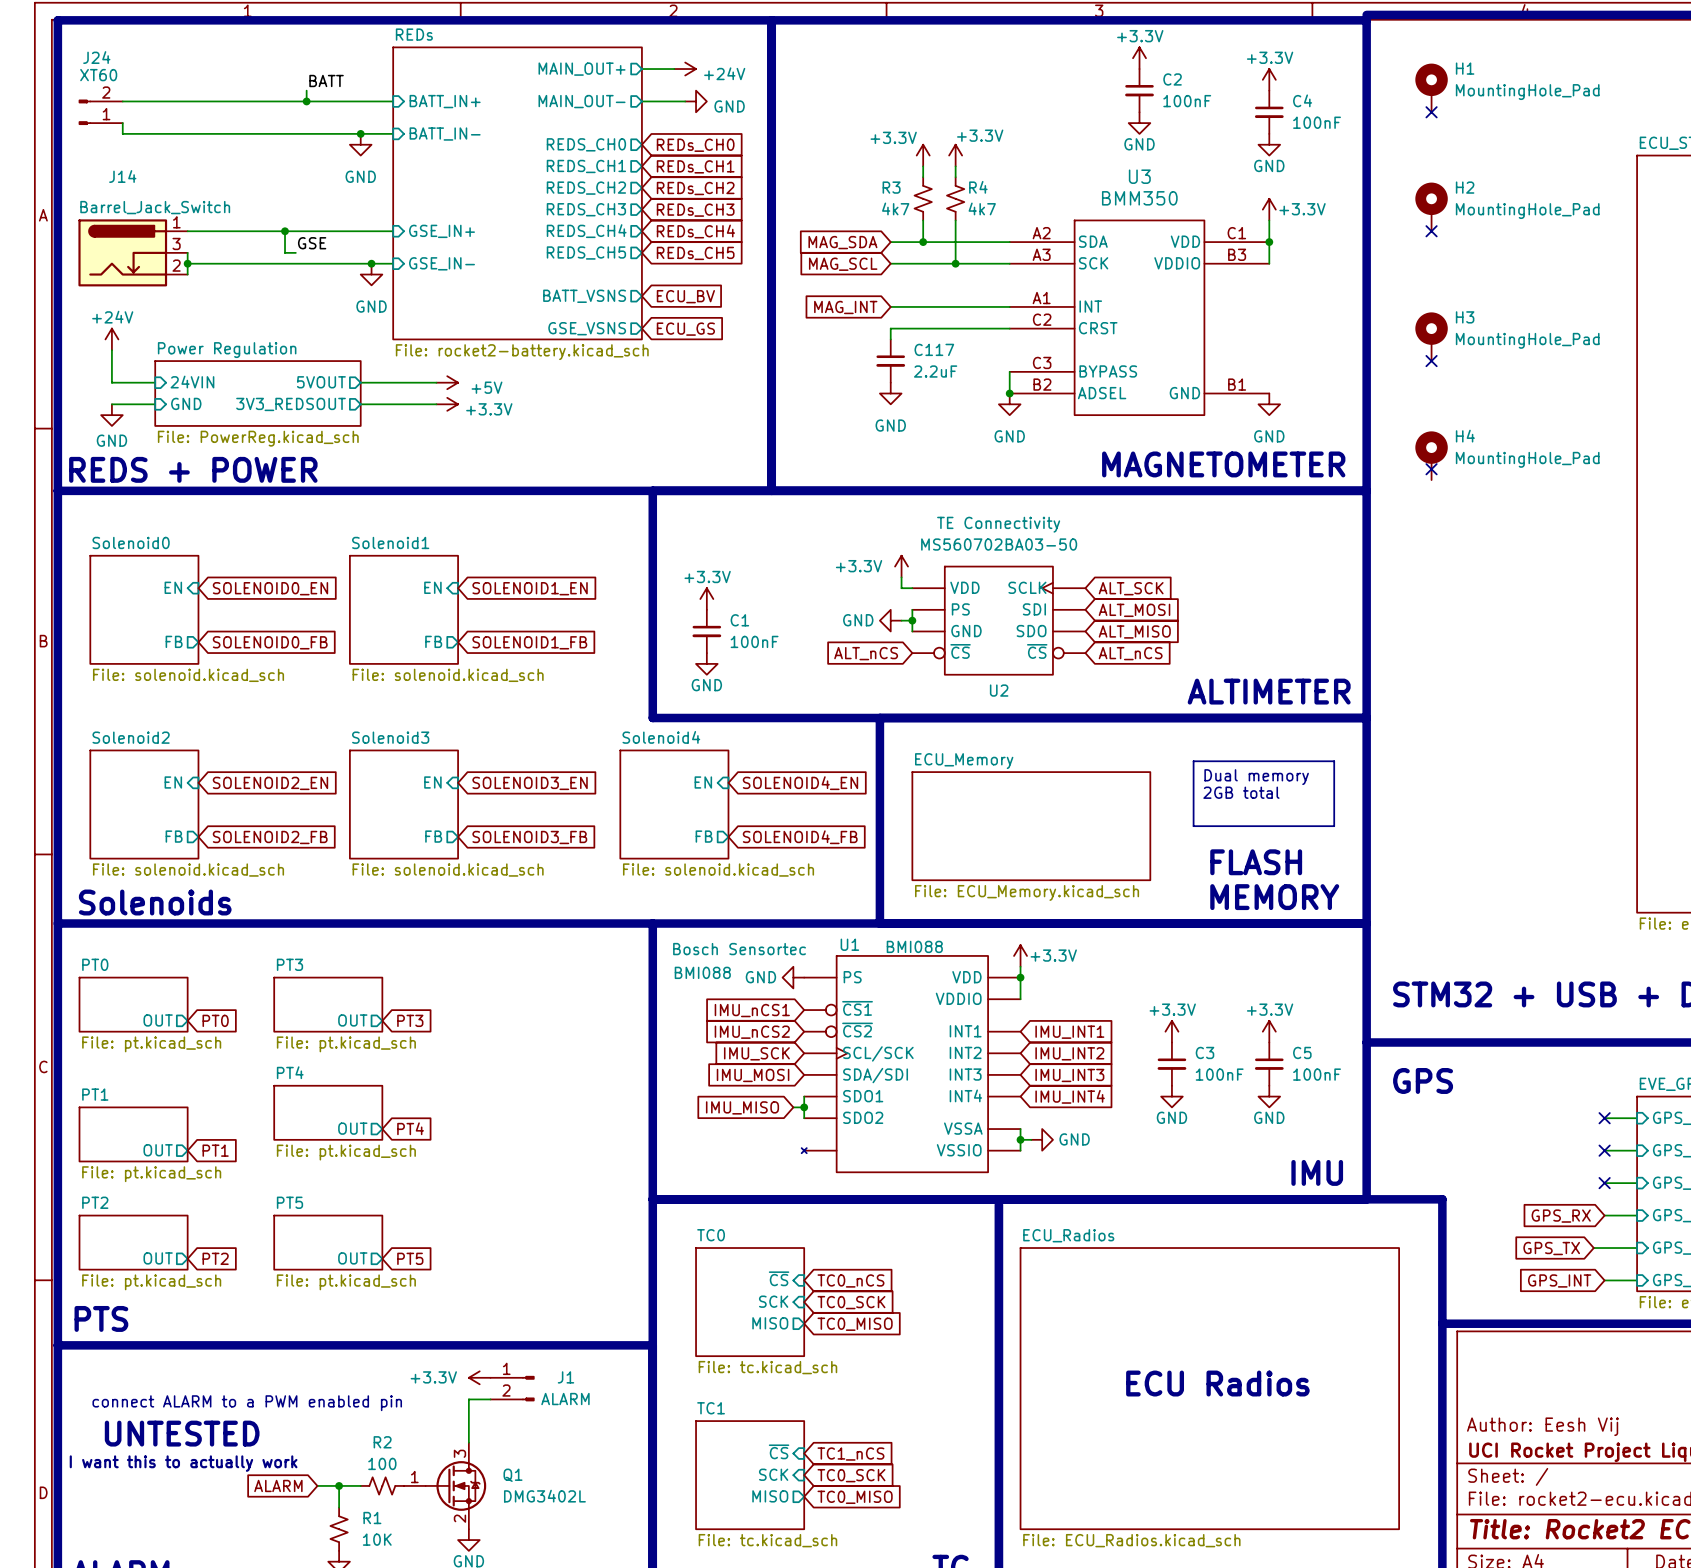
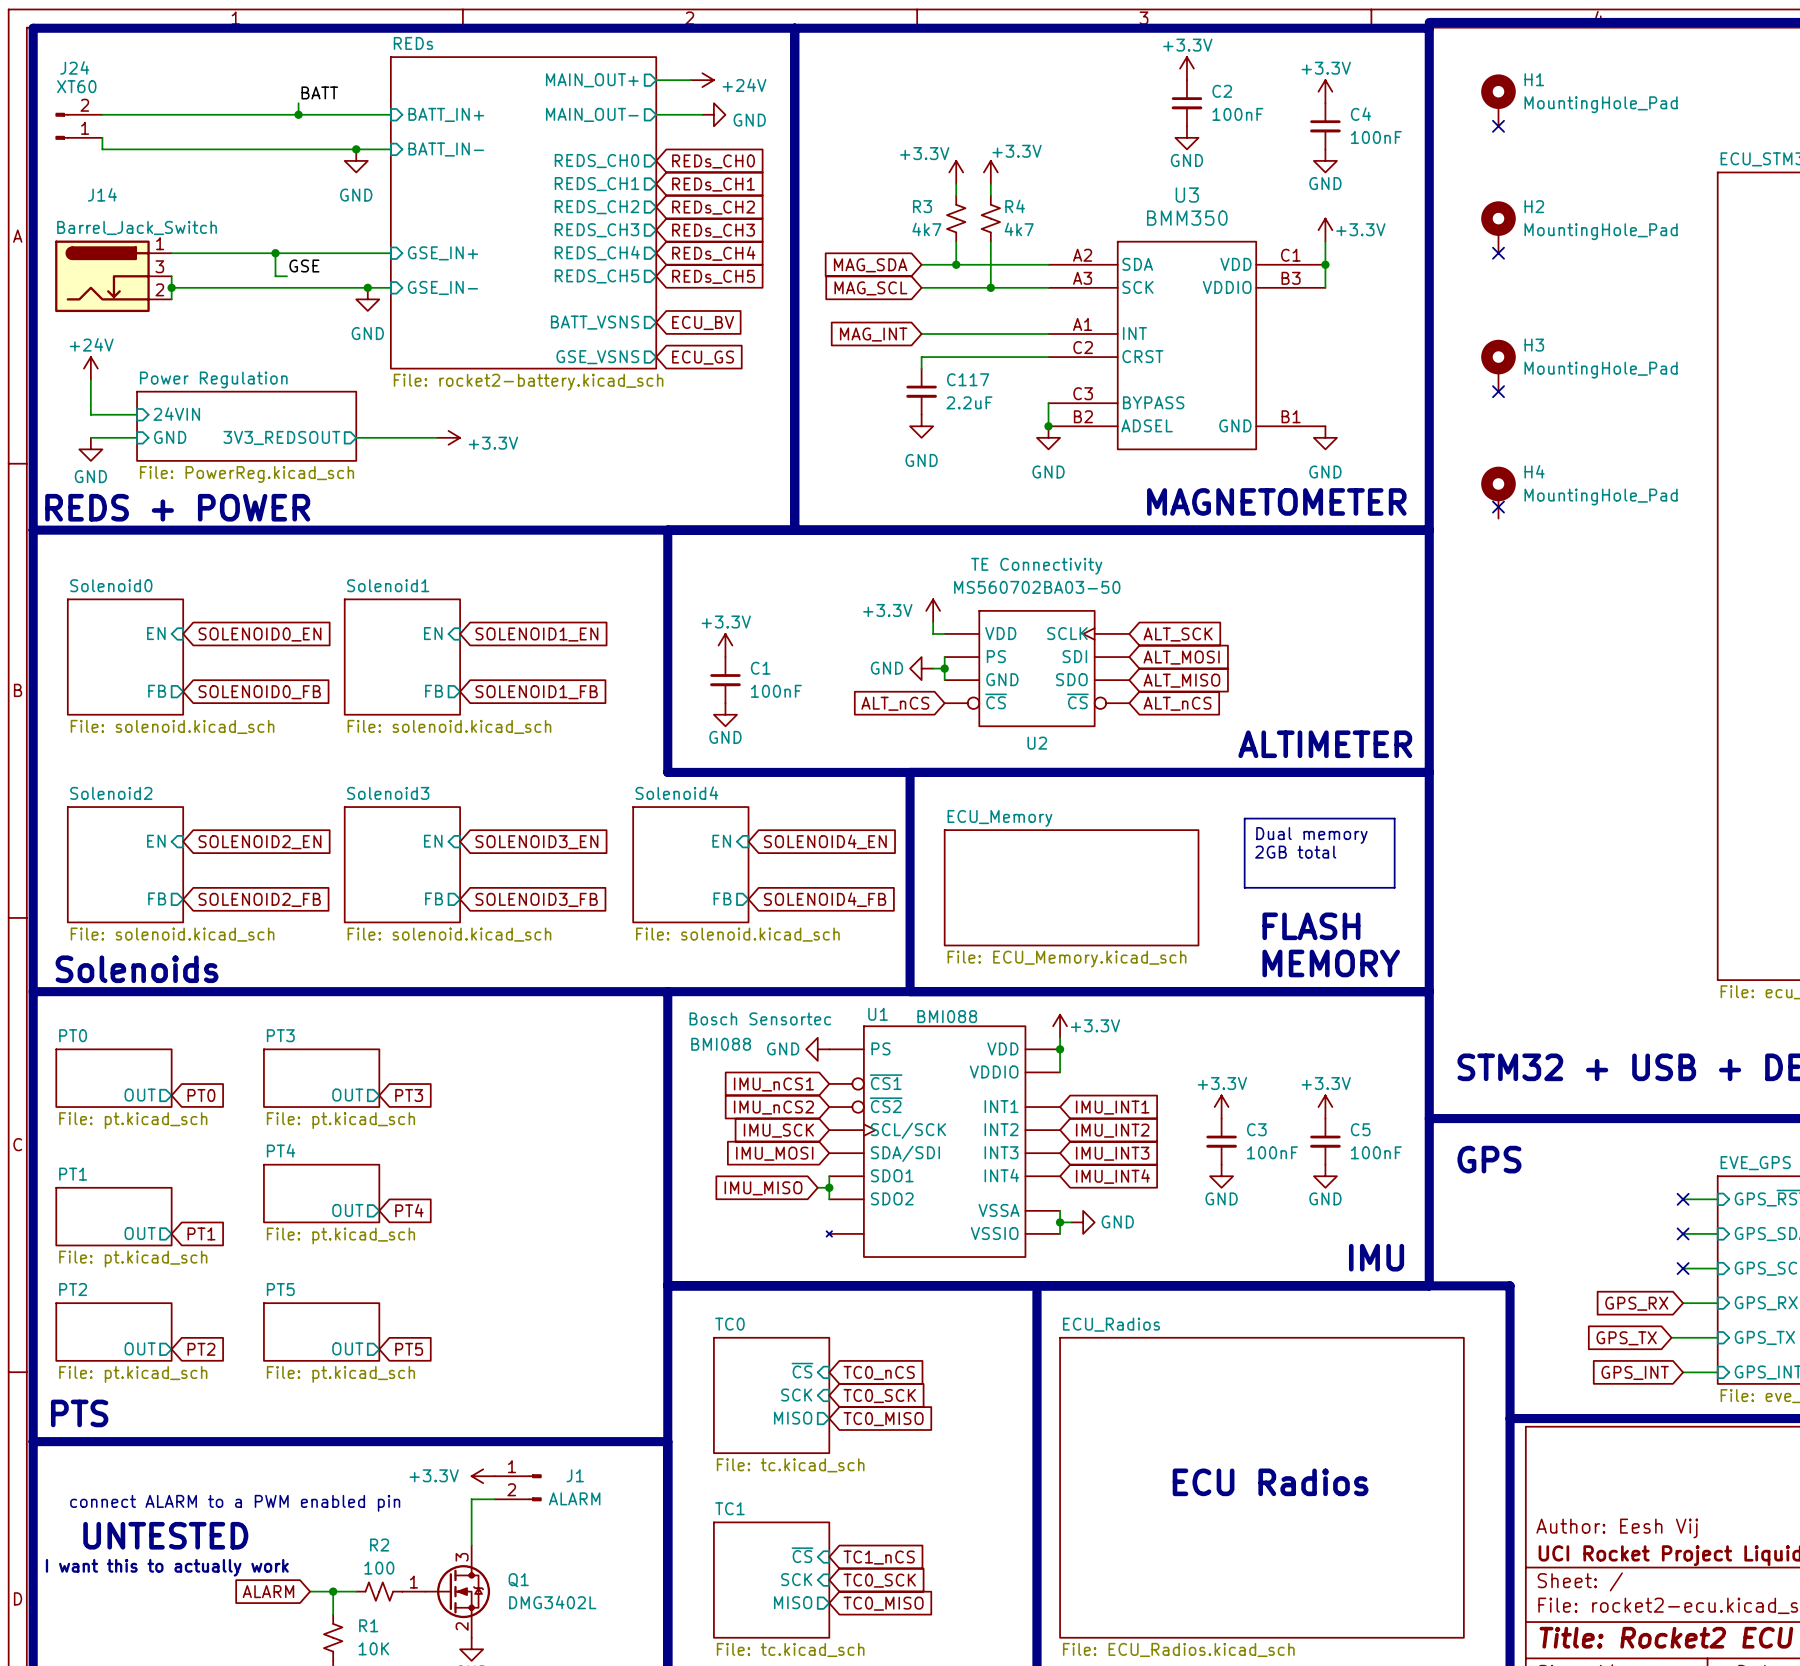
sheet pin: 5VOUT (321, 382) -> none
wire: (360, 382) (436, 382) -> none
power symbol: +5V (447, 382) -> none

